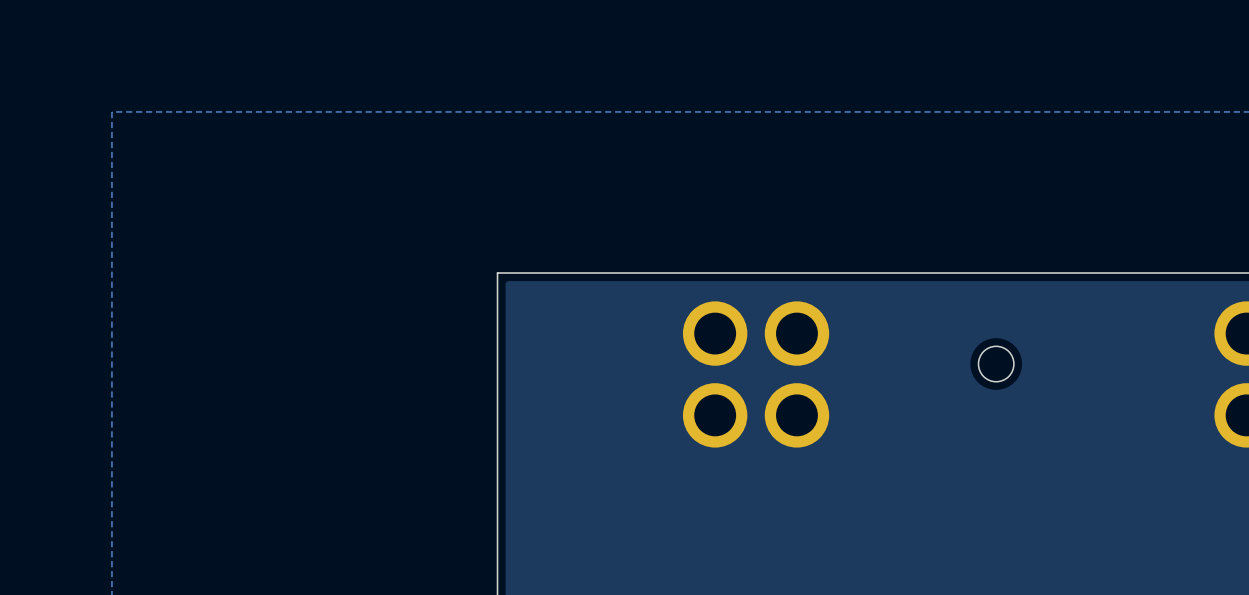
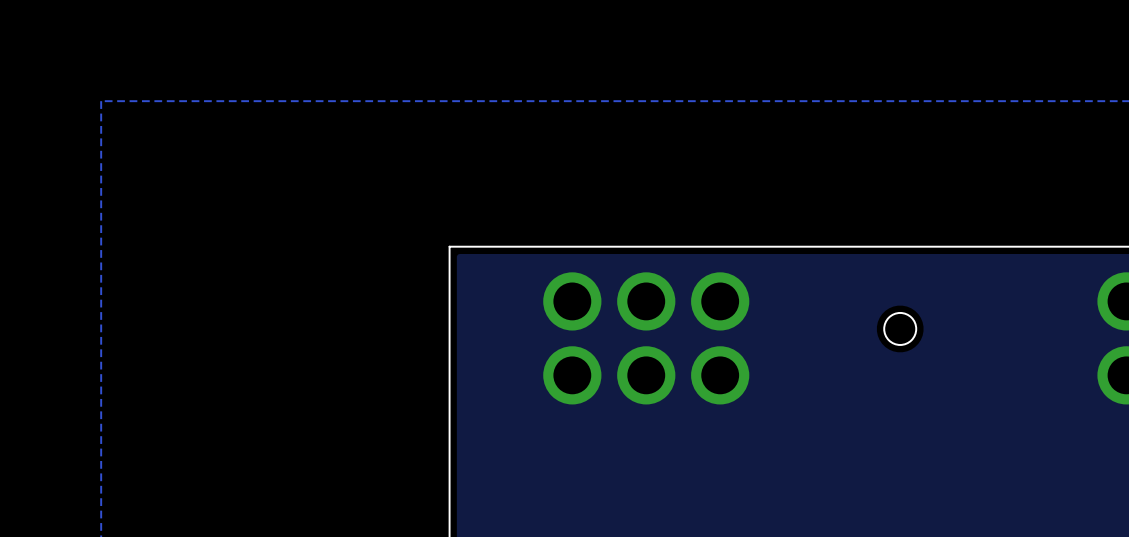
part: none -> (572, 301)
part: none -> (572, 375)

